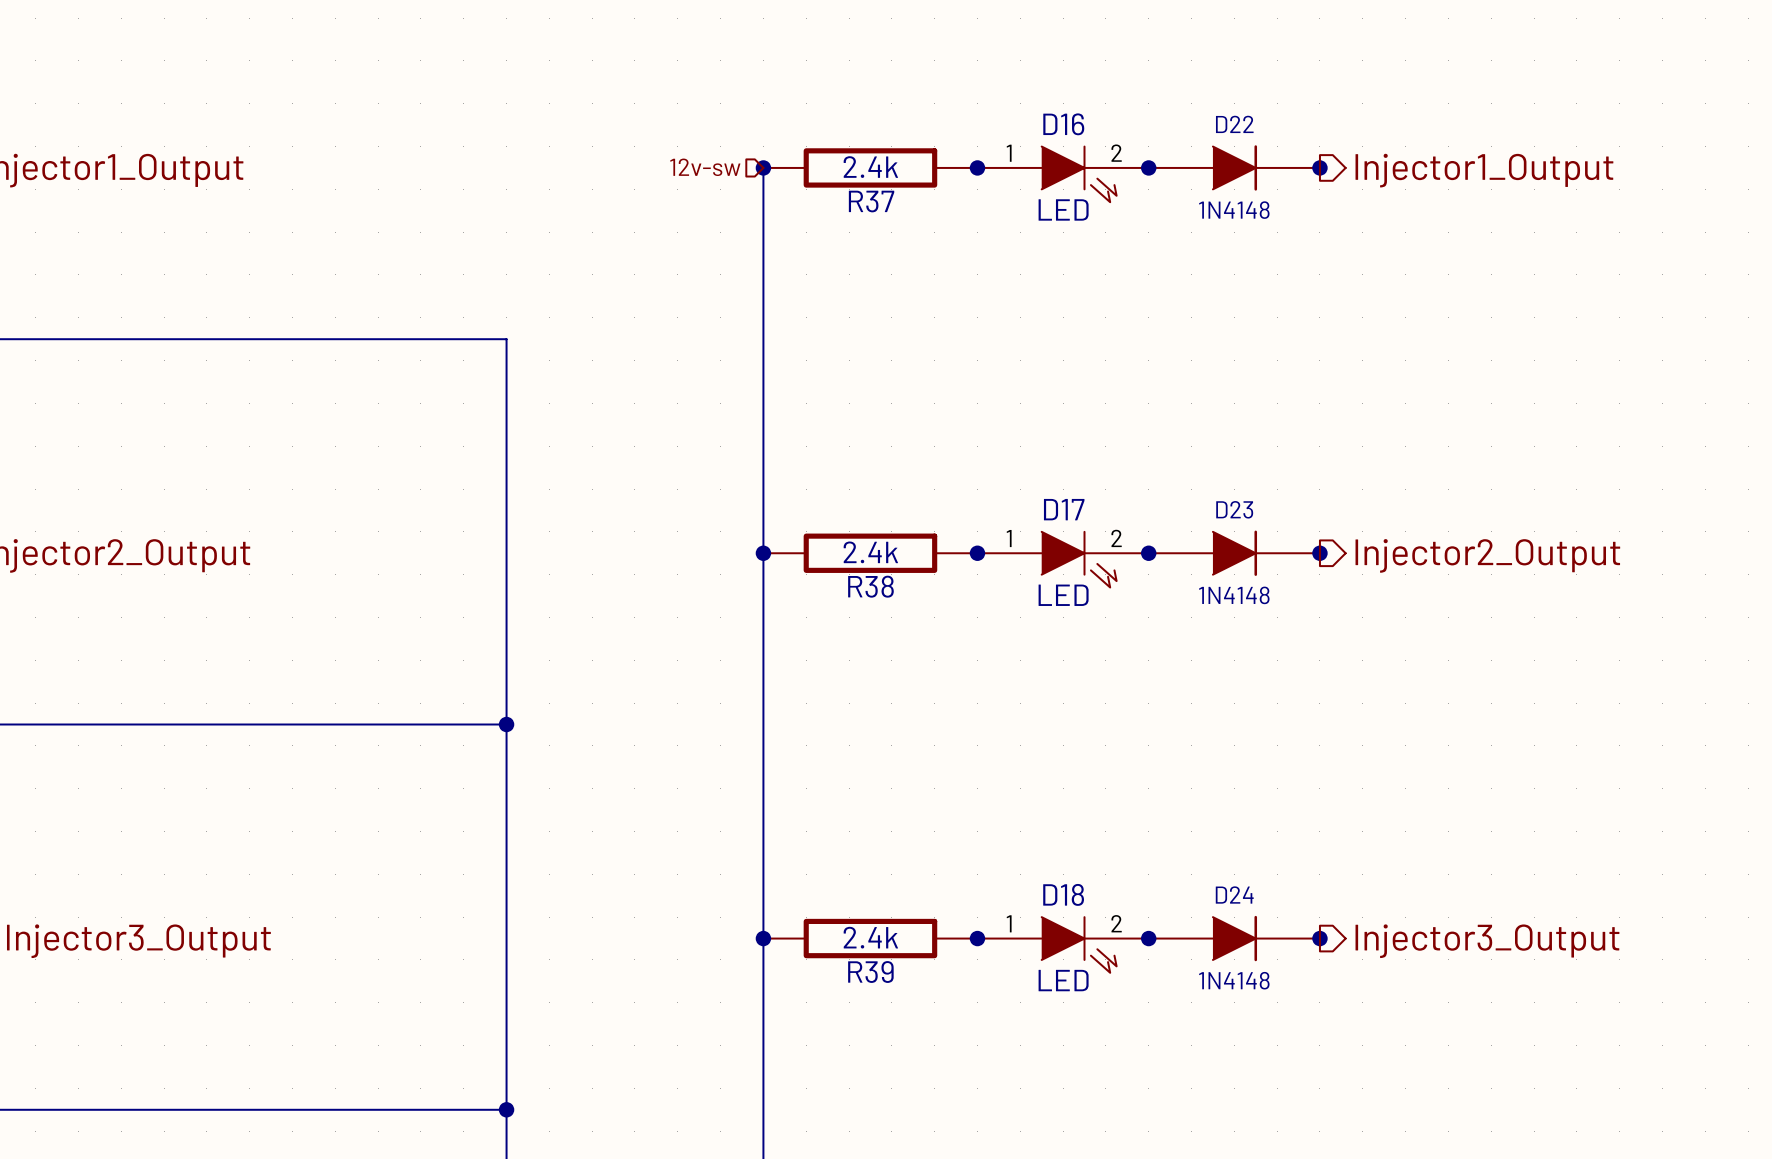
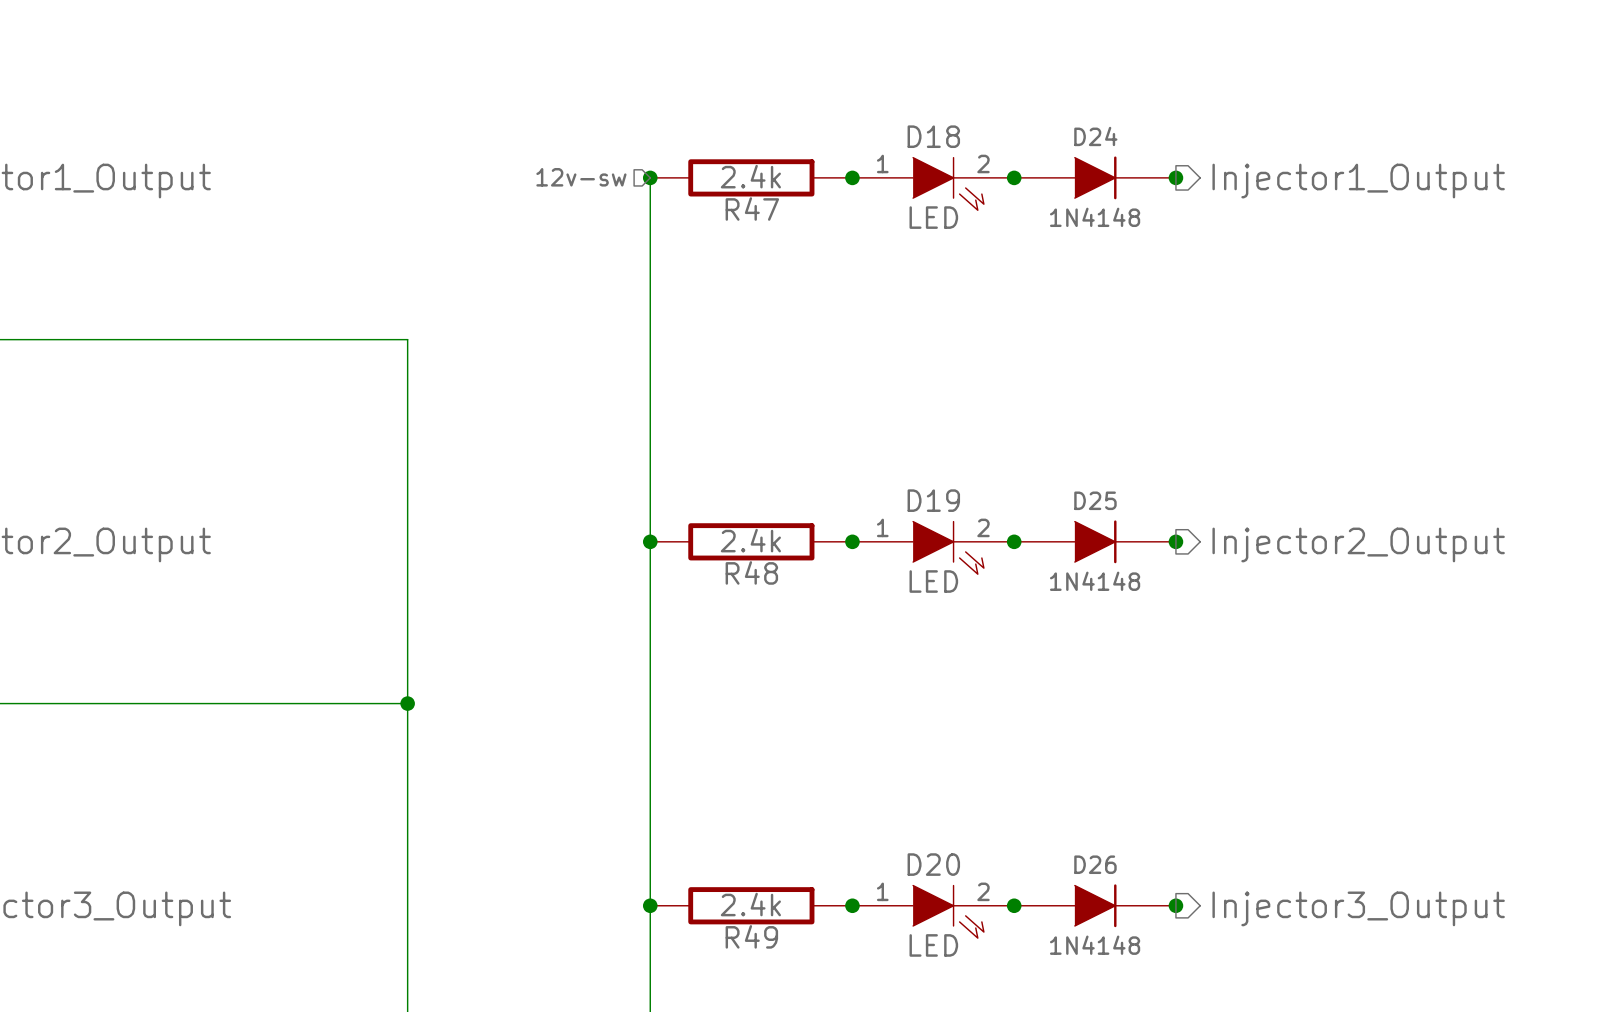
D16 name: D16 (1063, 124) -> D18 (933, 136)
D22 name: D22 (1234, 124) -> D24 (1095, 136)
R37 name: R37 (871, 201) -> R47 (752, 209)
D17 name: D17 (1064, 509) -> D19 (933, 500)
D23 name: D23 (1234, 509) -> D25 (1095, 500)
R38 name: R38 (870, 586) -> R48 (751, 572)
D18 name: D18 (1063, 894) -> D20 (933, 864)
D24 name: D24 (1234, 895) -> D26 (1095, 864)
R39 name: R39 (870, 972) -> R49 (751, 936)

